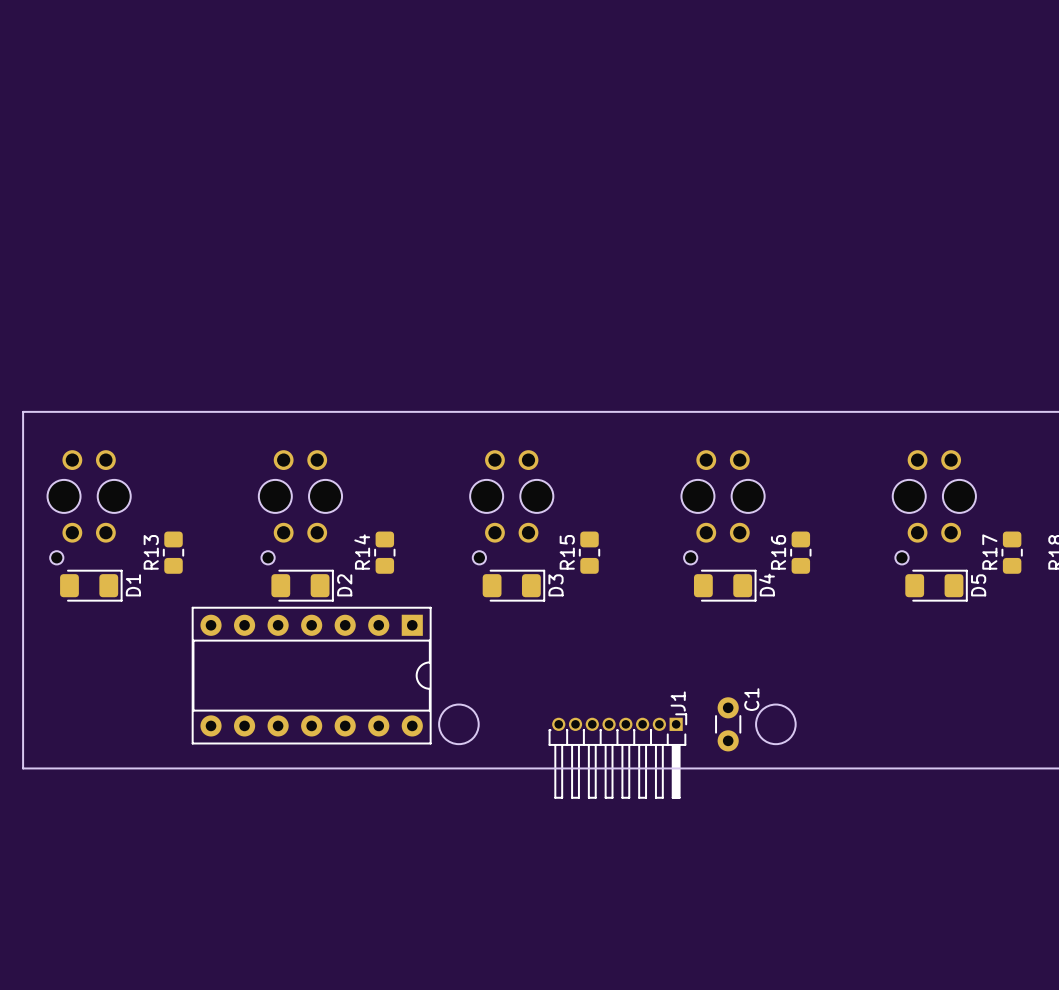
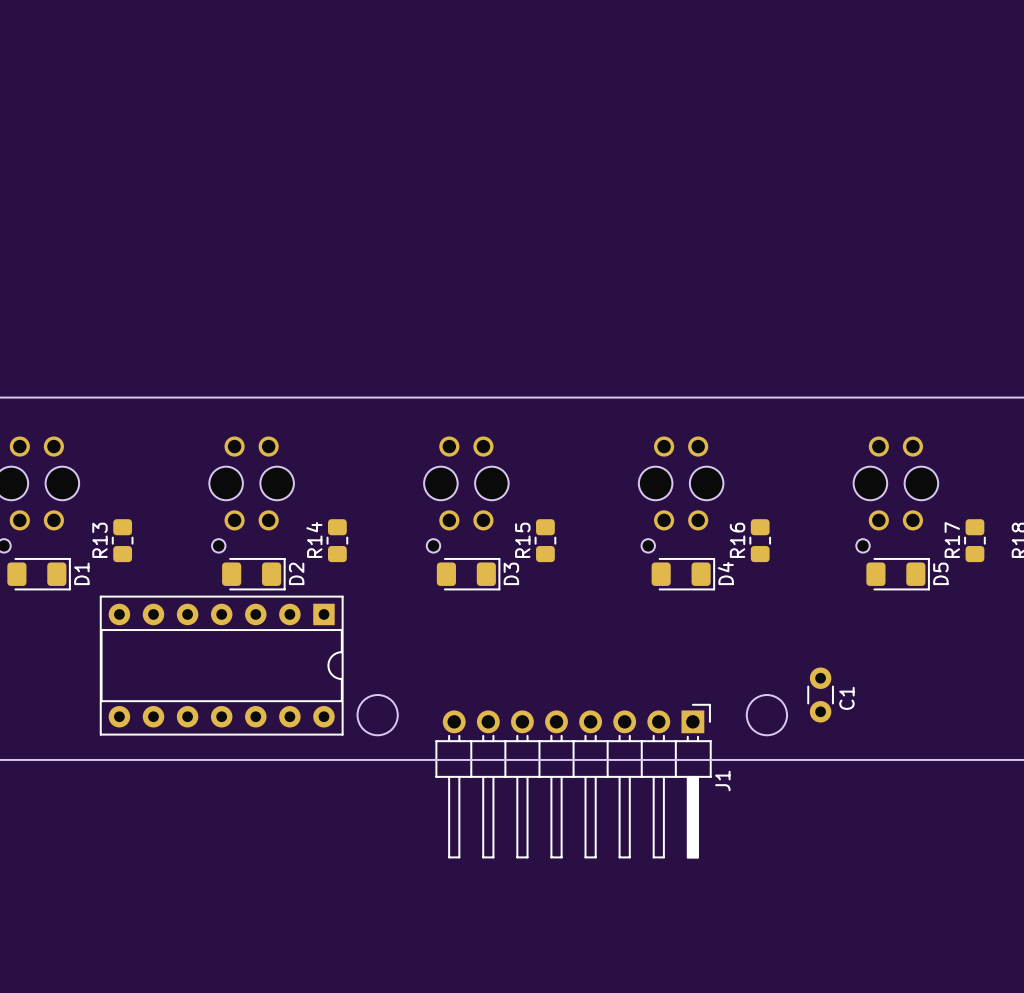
part position: (311, 675) -> (221, 665)
C1 name position: C1 (751, 699) -> C1 (846, 698)
J1 name position: J1 (678, 701) -> J1 (722, 781)
J1 footprint: [548, 713, 687, 799] -> [435, 703, 712, 859]
round board edge position: (458, 724) -> (377, 715)
C1 position: (728, 724) -> (820, 694)
round board edge position: (775, 724) -> (766, 715)

